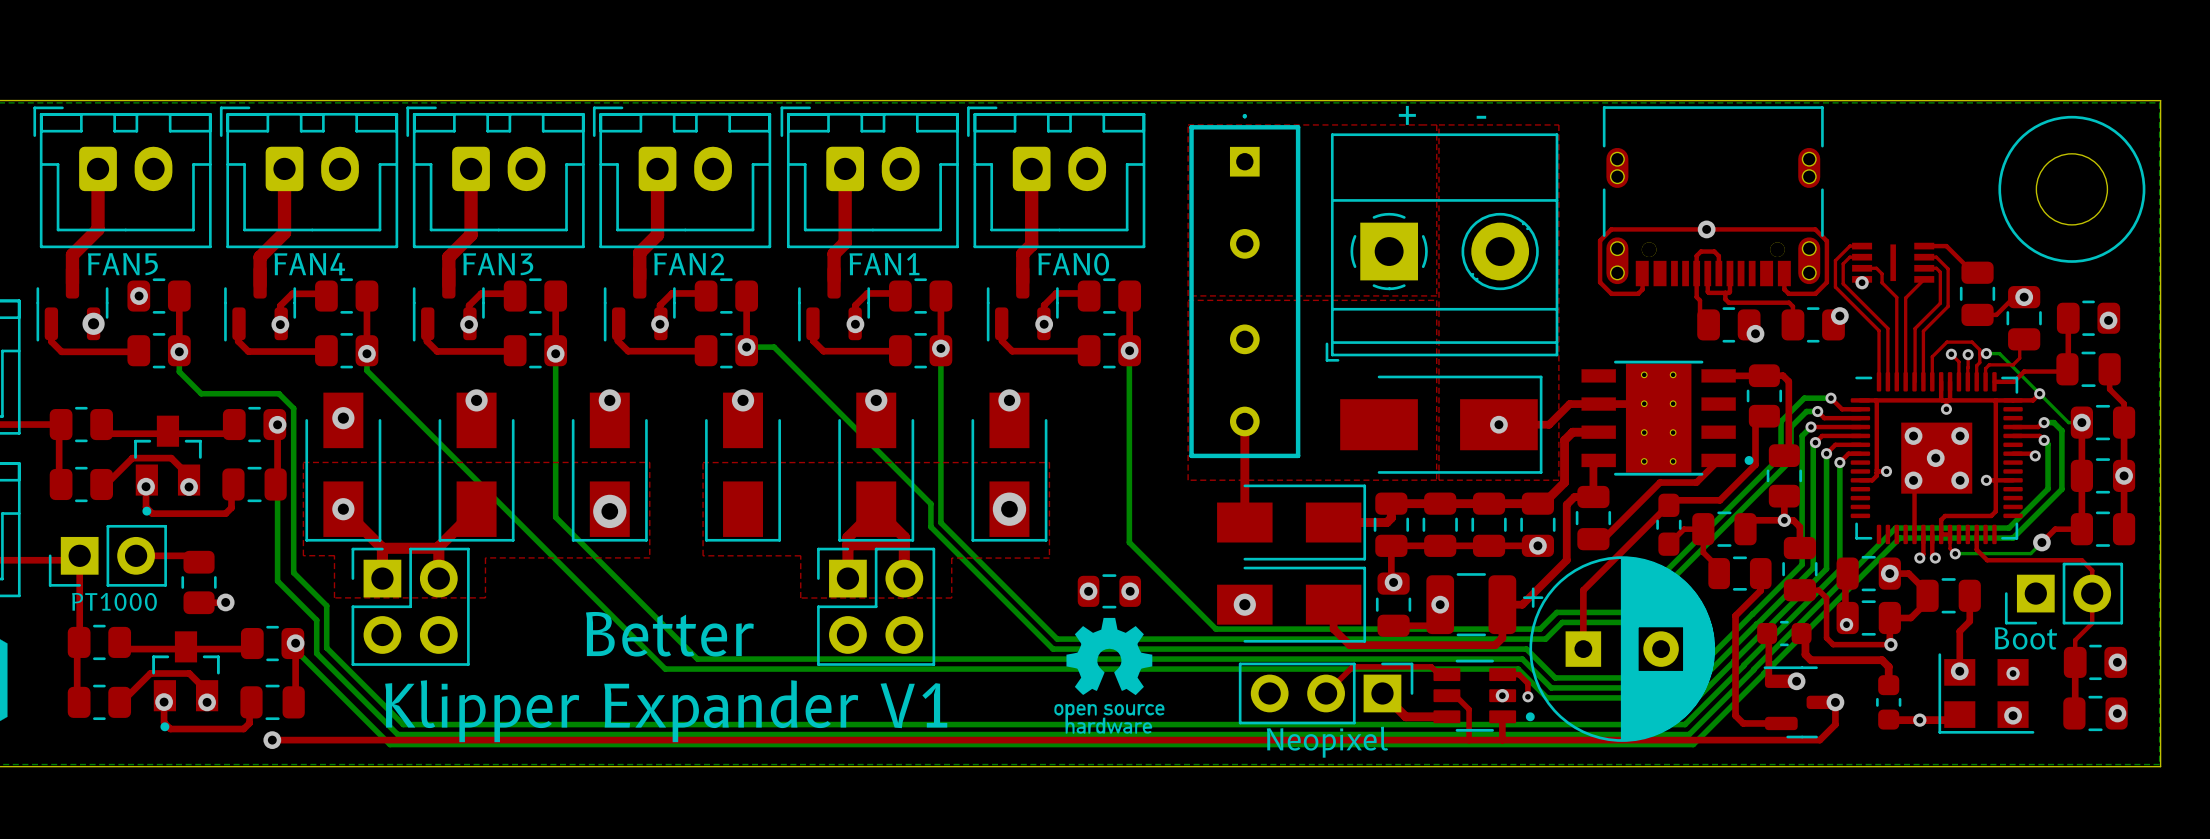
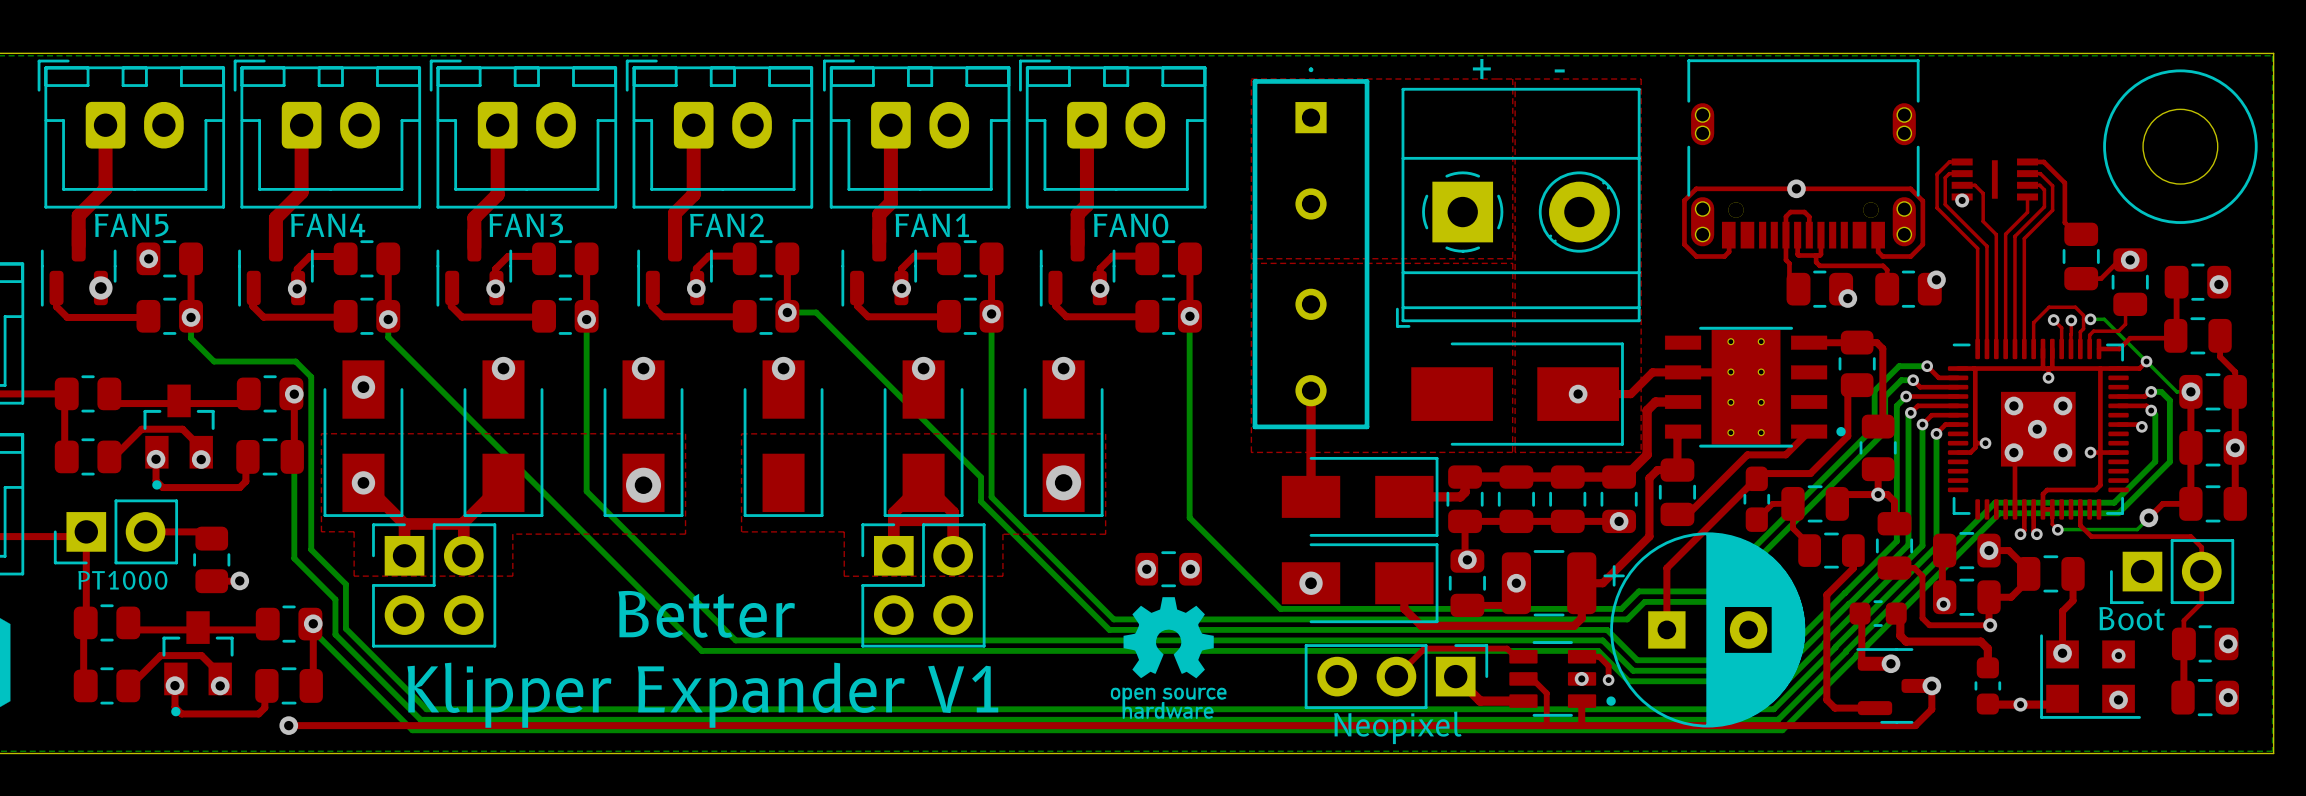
top track: (1862, 246) (1849, 246) (1835, 260) (1835, 287) (1879, 330) -> (1962, 161) (1949, 161) (1937, 174) (1937, 207) (1977, 248) (1977, 295)
top track: (1919, 246) (1946, 246) (1961, 261) -> (2027, 161) (2043, 161) (2064, 182) (2064, 222)
top track: (1862, 257) (1849, 257) (1843, 263) (1843, 283) (1887, 328) -> (1962, 173) (1949, 173) (1945, 177) (1945, 204) (1986, 246) (1986, 292)
top track: (1924, 257) (1936, 257) (1948, 268) (1948, 306) (1923, 331) -> (2027, 173) (2040, 173) (2052, 185) (2052, 210) (2024, 238) (2024, 295)
part position: (1893, 262) -> (1994, 179)
top track: (1862, 268) (1876, 268) (1882, 273) (1882, 282) (1896, 297) -> (1962, 185) (1975, 185) (1983, 193) (1983, 221) (1996, 234) (1996, 260)
top track: (1924, 268) (1936, 268) (1940, 272) (1940, 303) (1915, 328) (1915, 381) -> (2027, 185) (2039, 185) (2044, 189) (2044, 206) (2014, 236) (2014, 348)
top track: (1924, 279) (1905, 297) -> (2027, 196) (2027, 212) (2005, 234) (2005, 260)
via position: (1862, 282) -> (1962, 200)

